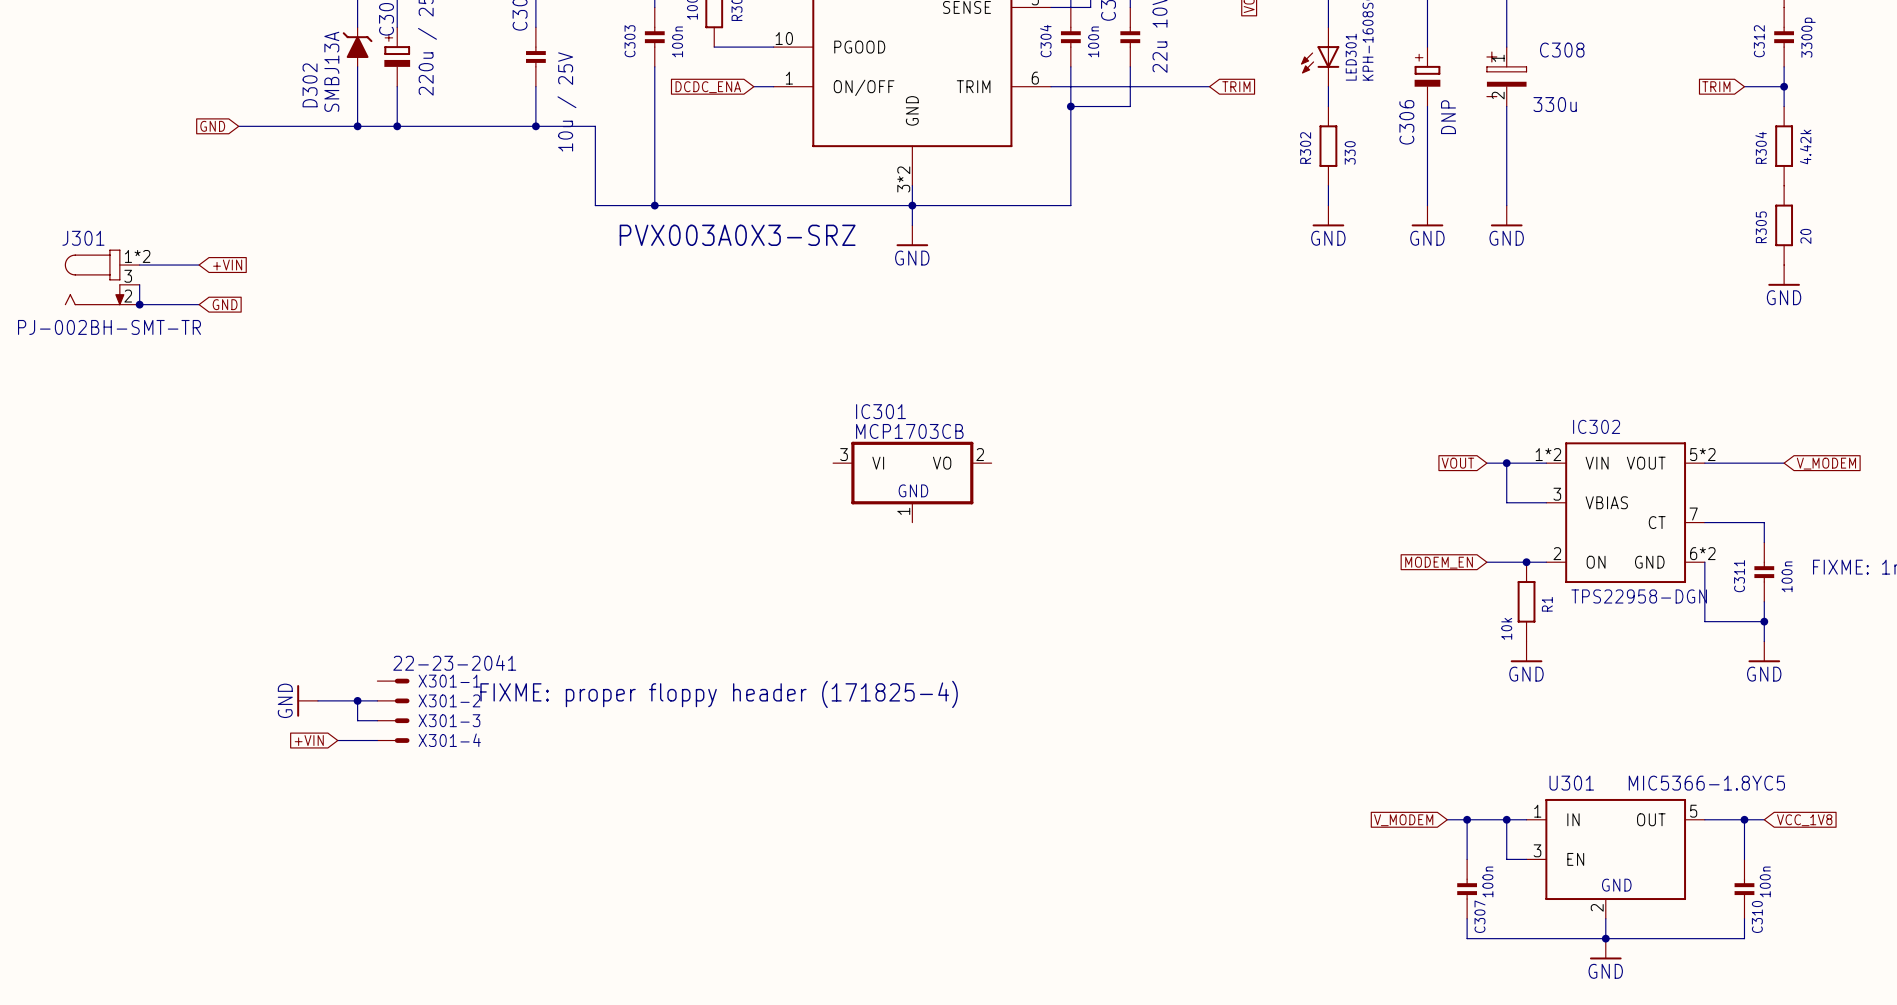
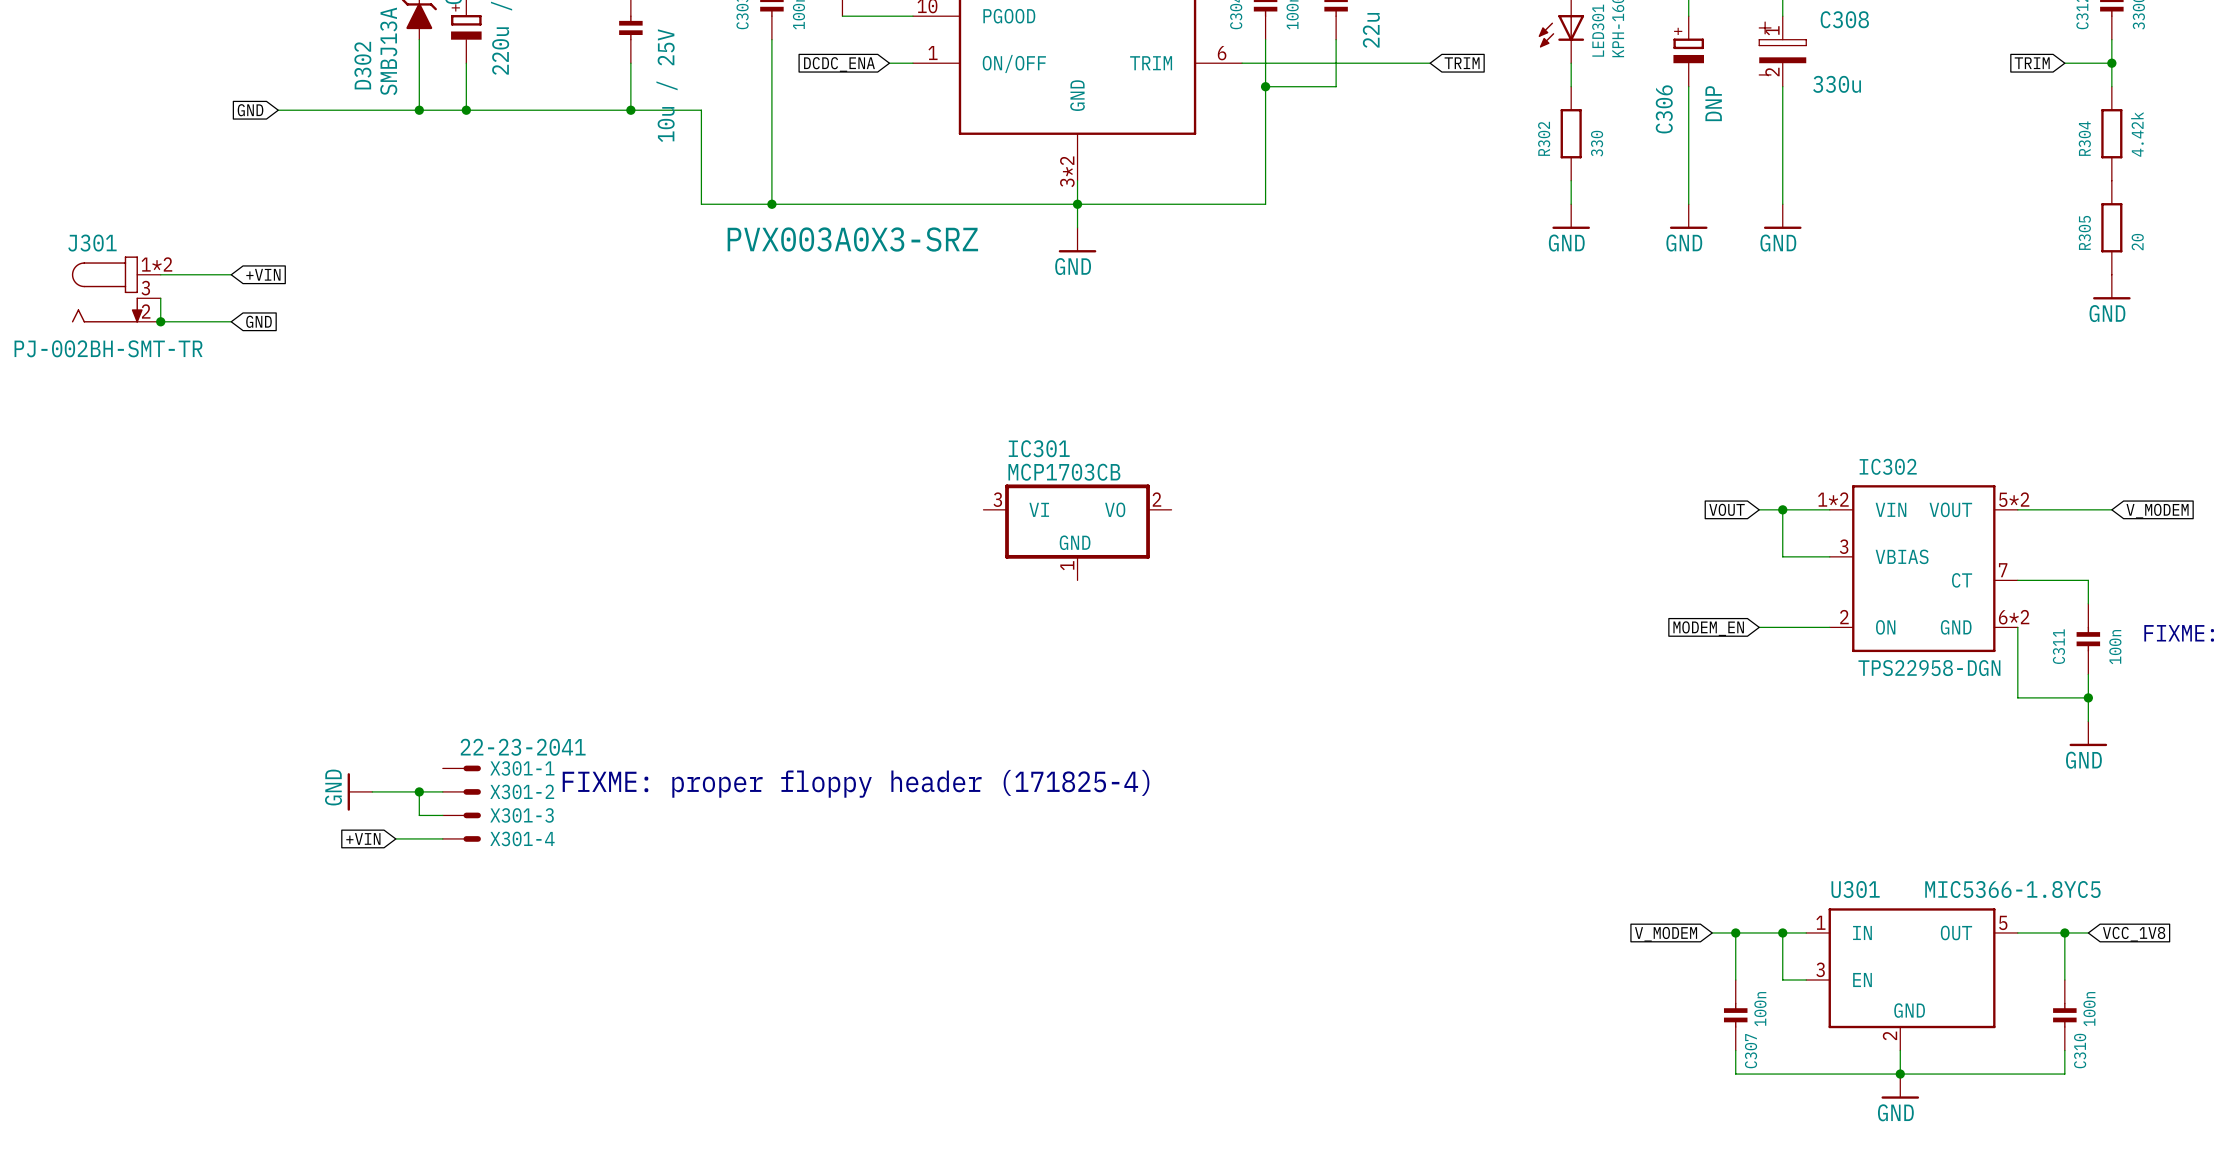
junction: (1526, 562) -> none
R1: 10k (1526, 601) -> none
power symbol: GND (1526, 651) -> none

